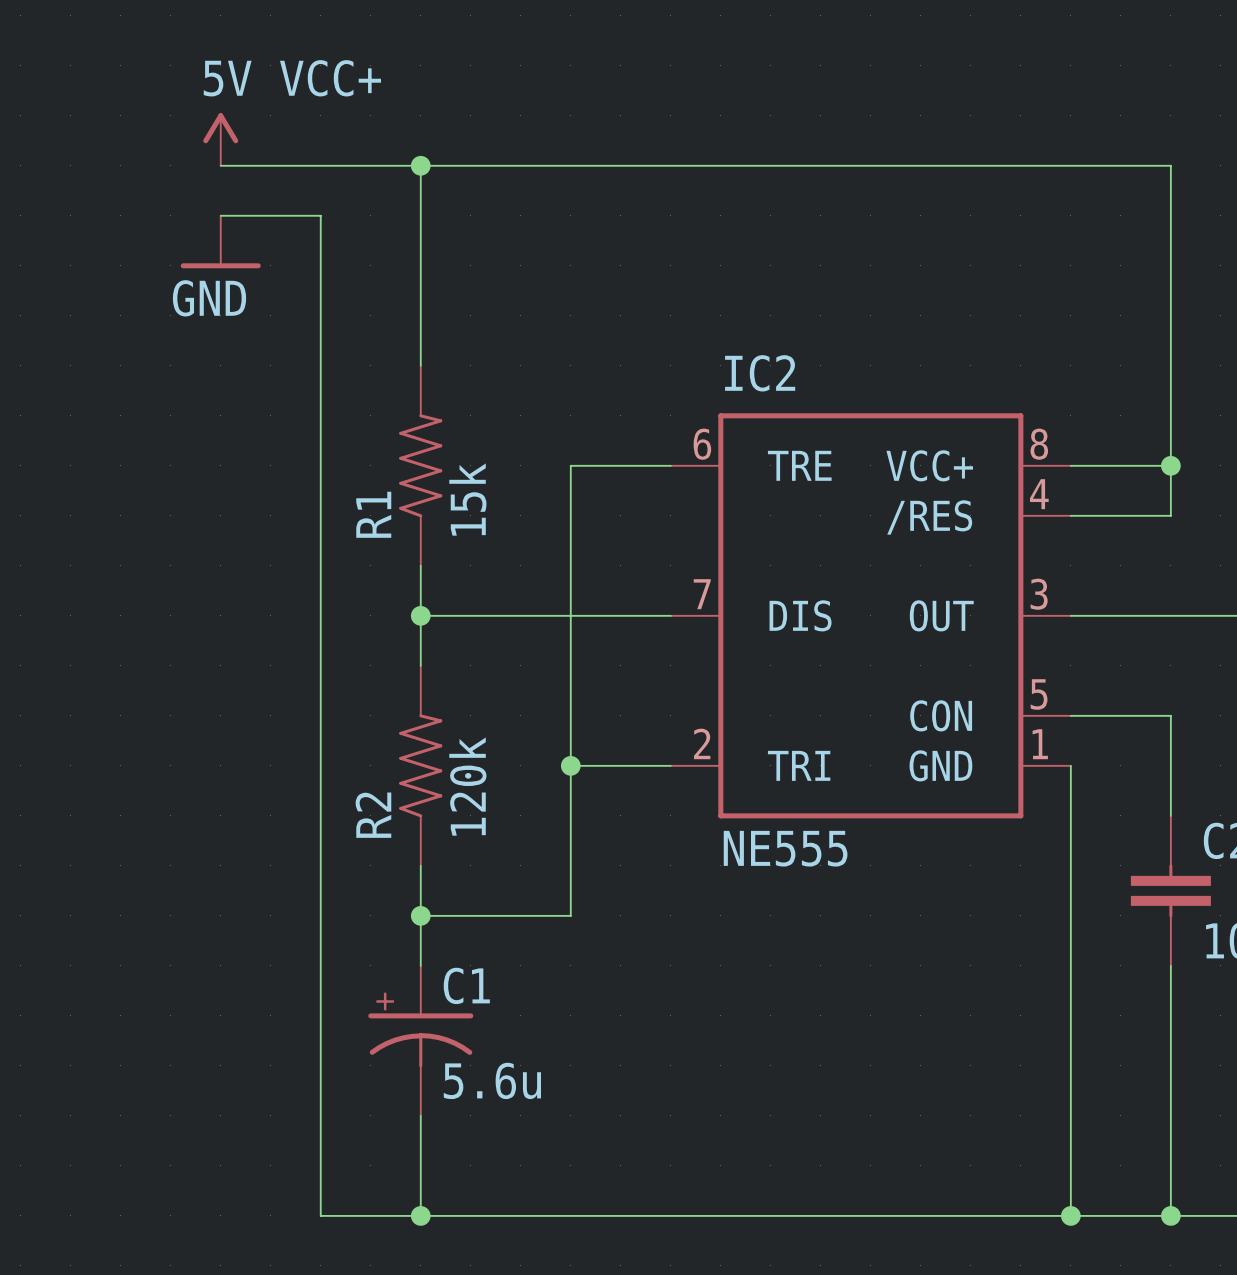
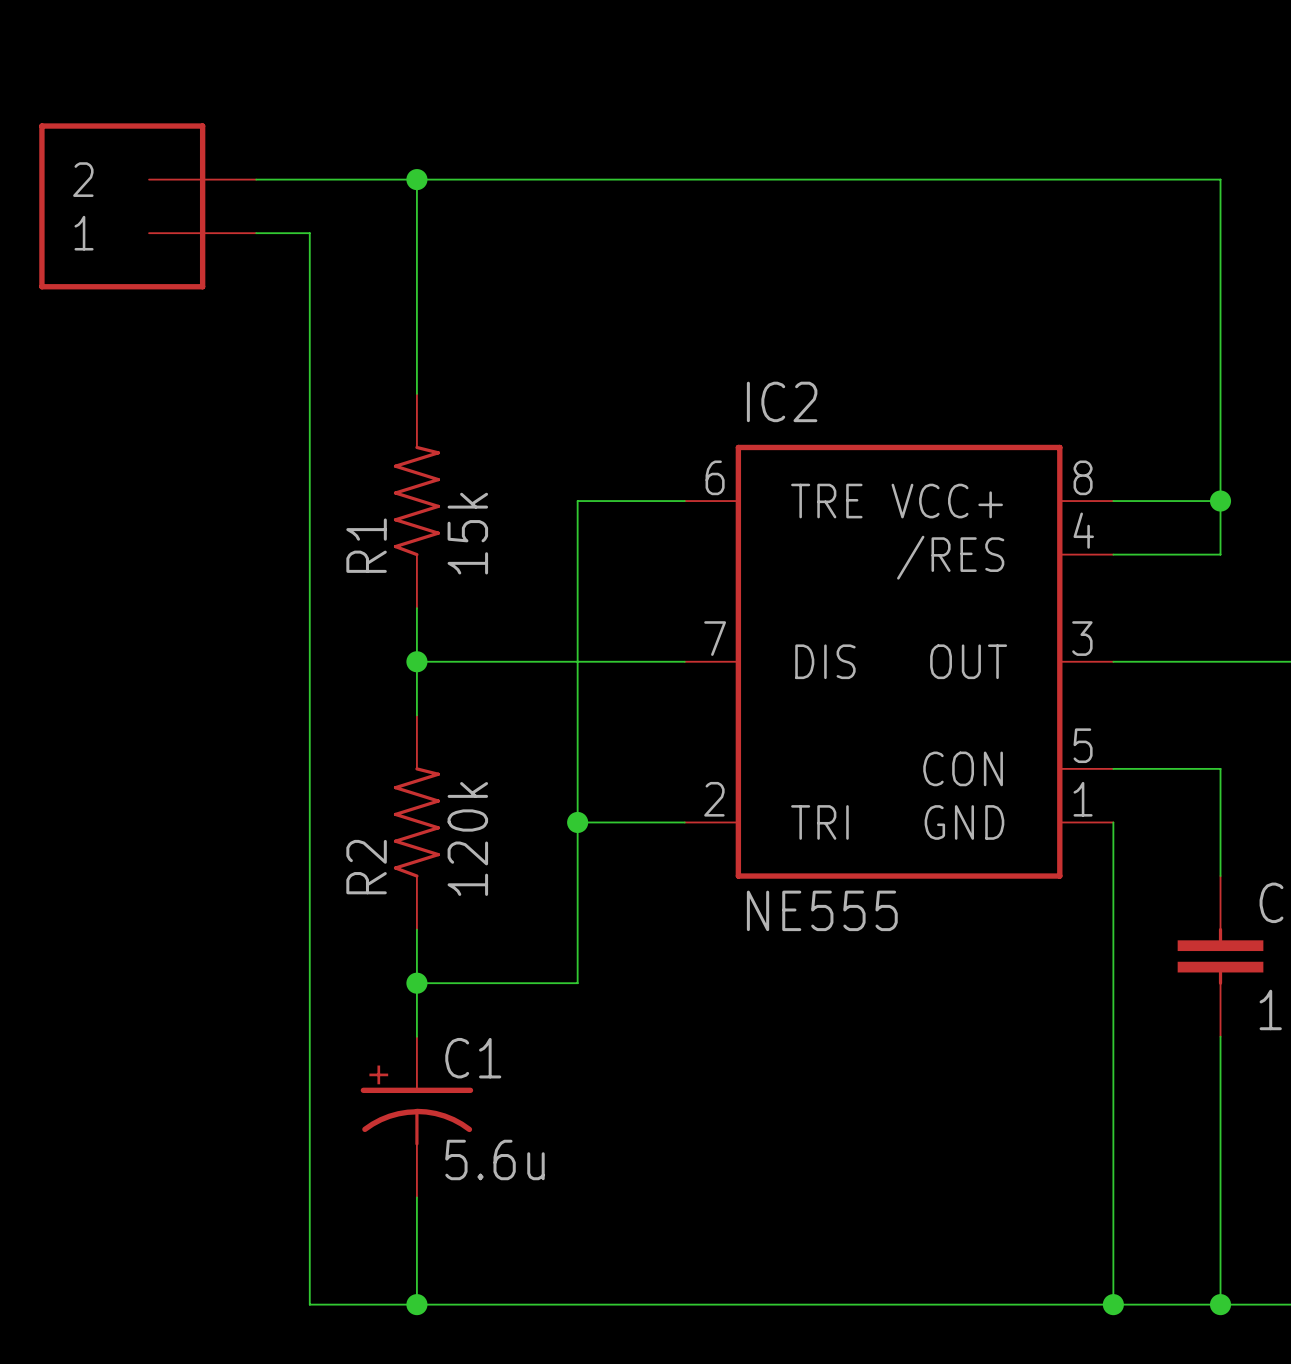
power symbol: 5V VCC+ (220, 139) -> none
part: none -> (147, 206)
power symbol: GND (220, 242) -> none

